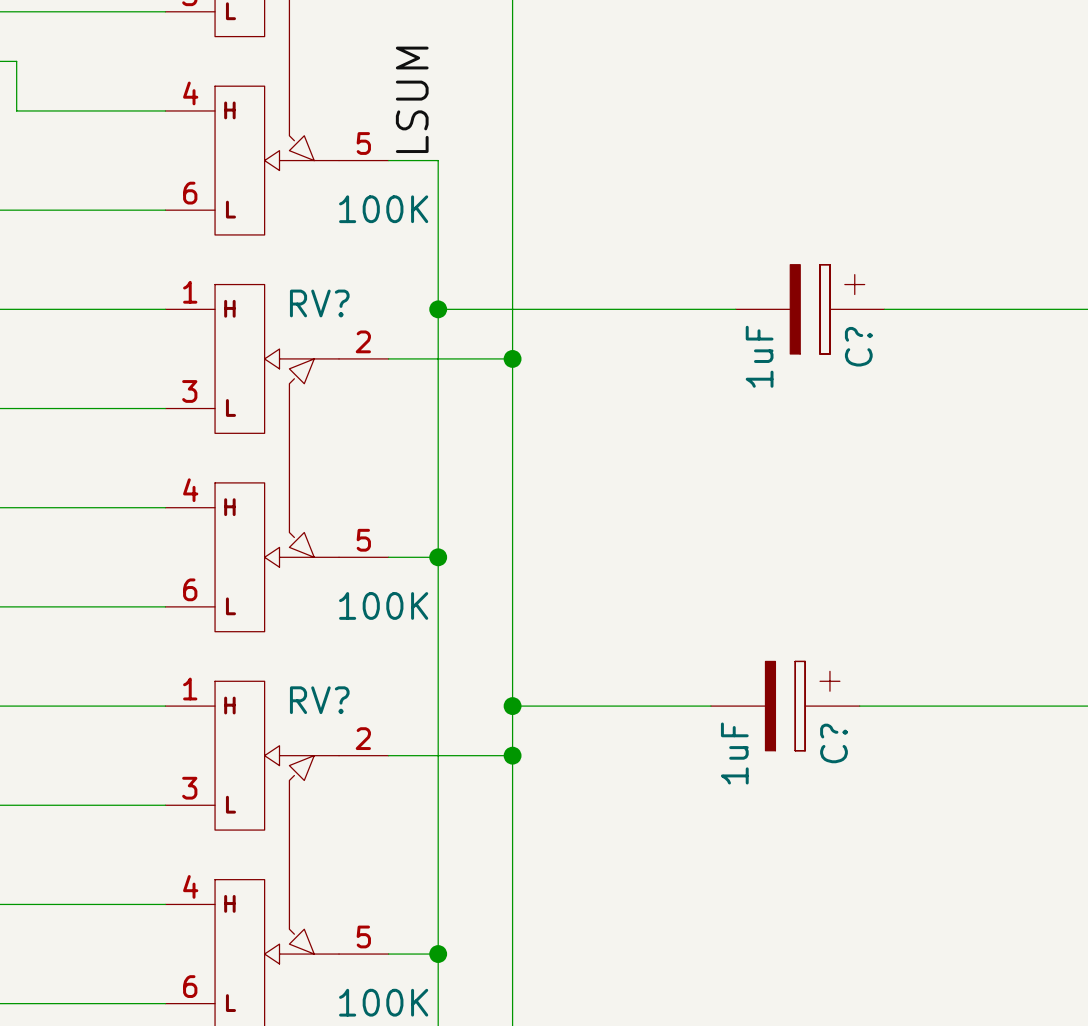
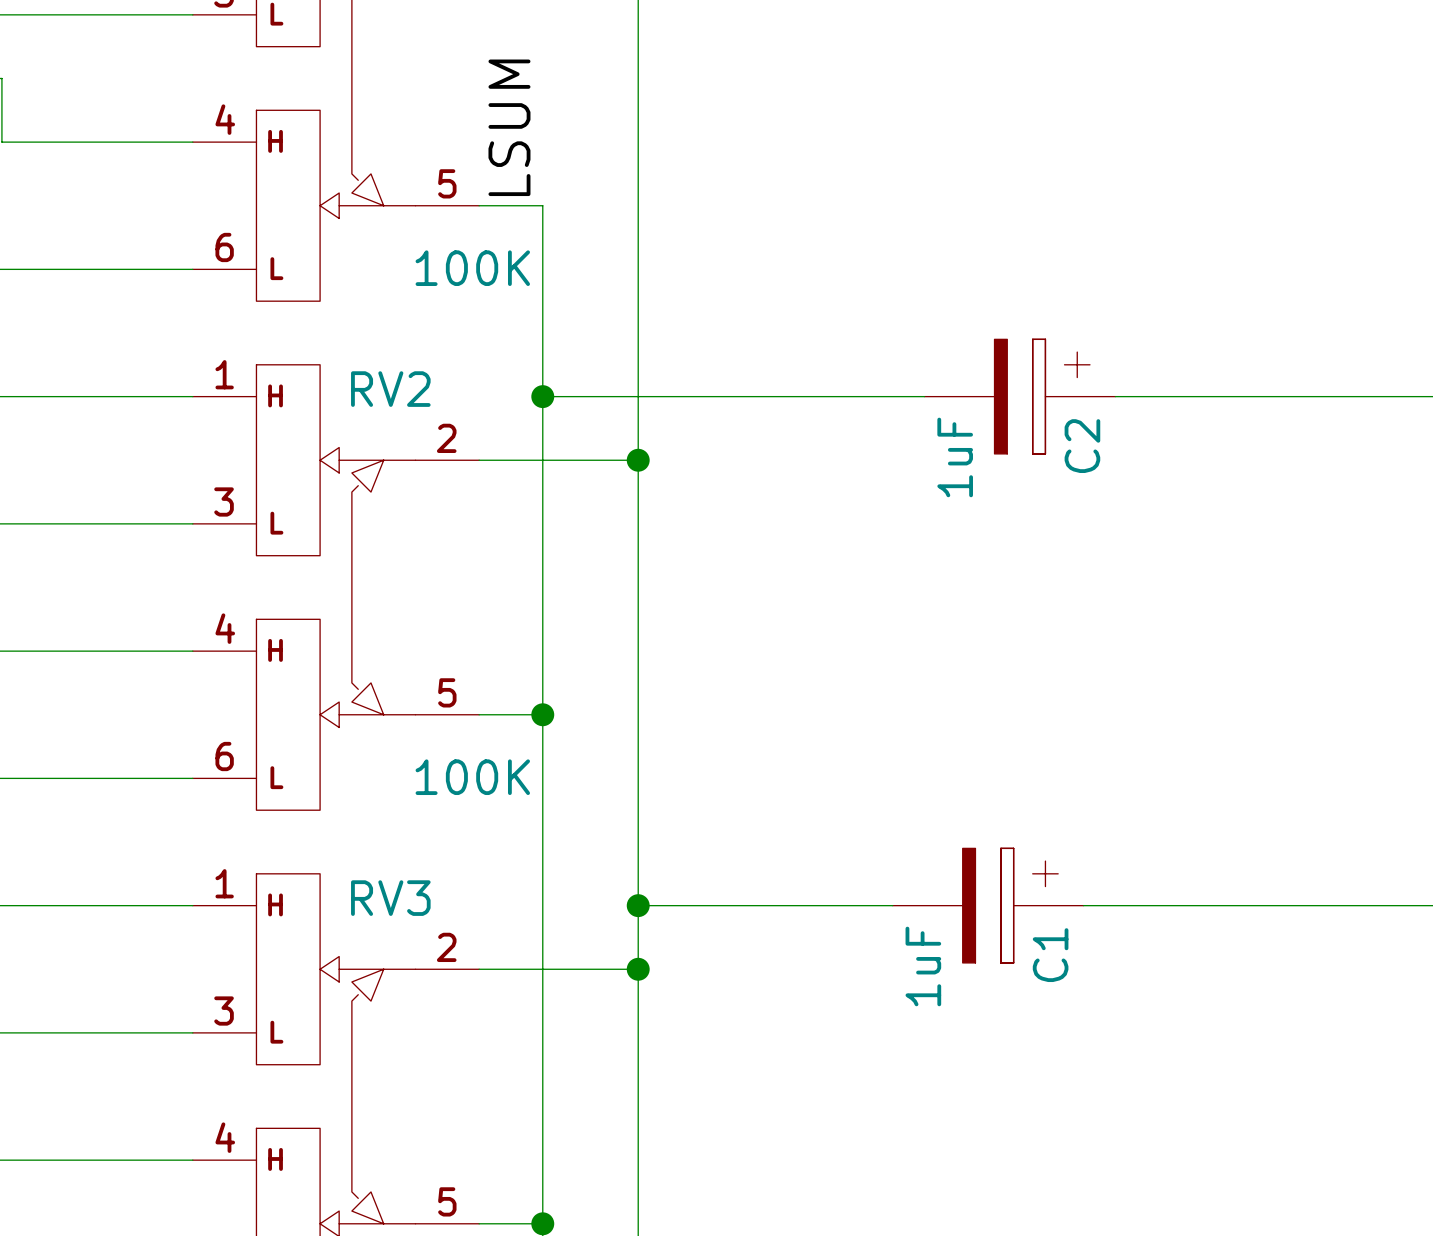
RV? name: RV? (319, 303) -> RV2 (390, 389)
C? name: C? (858, 346) -> C2 (1082, 446)
RV? name: RV? (319, 700) -> RV3 (390, 898)
C? name: C? (834, 743) -> C1 (1050, 955)

